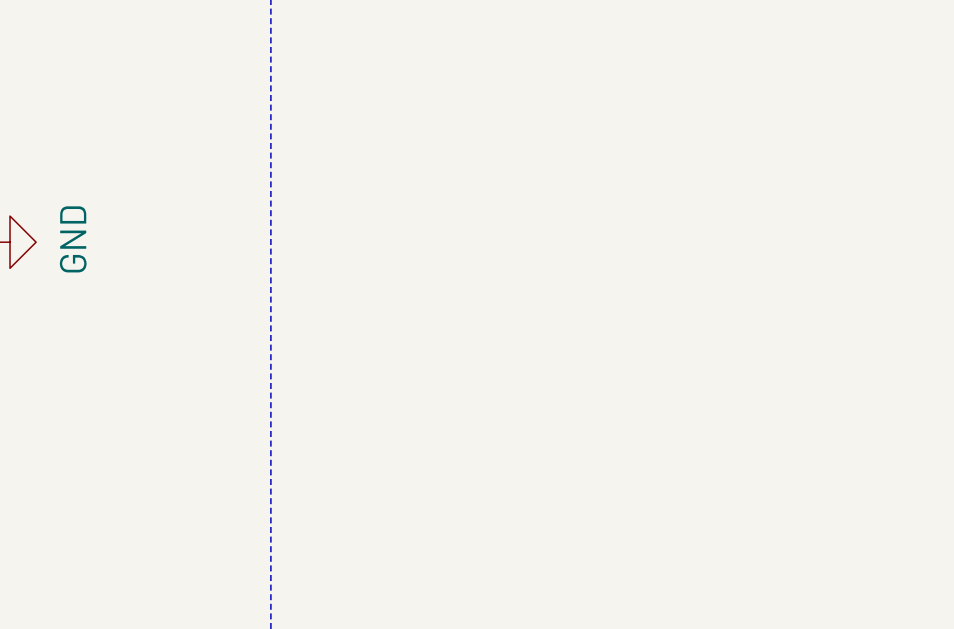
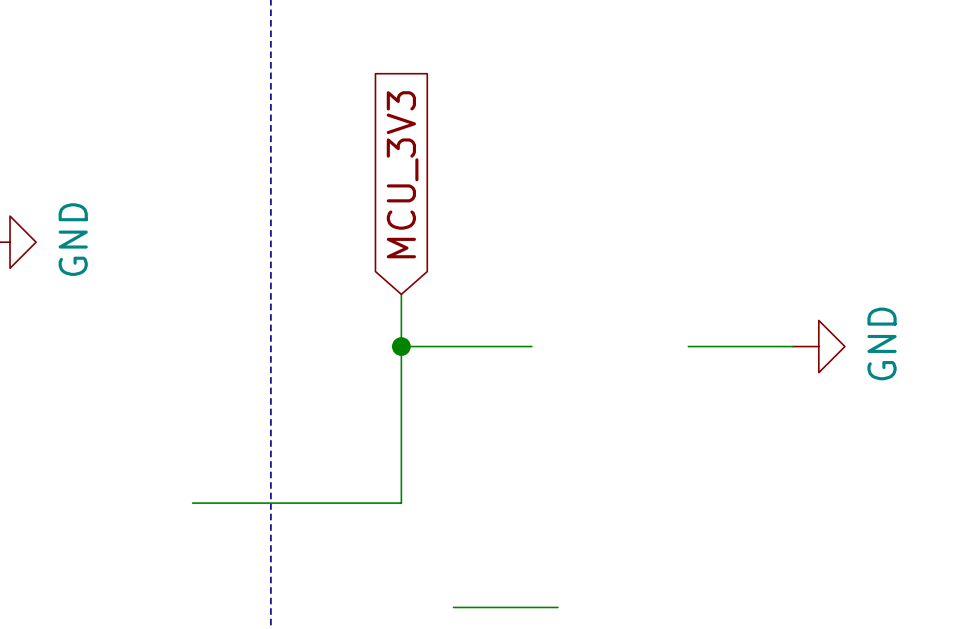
global label: none -> MCU_3V3 (402, 174)
wire: none -> (401, 294) (401, 503) (192, 503)
wire: none -> (401, 346) (531, 346)
junction: none -> (401, 346)
wire: none -> (688, 346) (792, 346)
power symbol: none -> GND (818, 346)
wire: none -> (453, 607) (557, 607)

